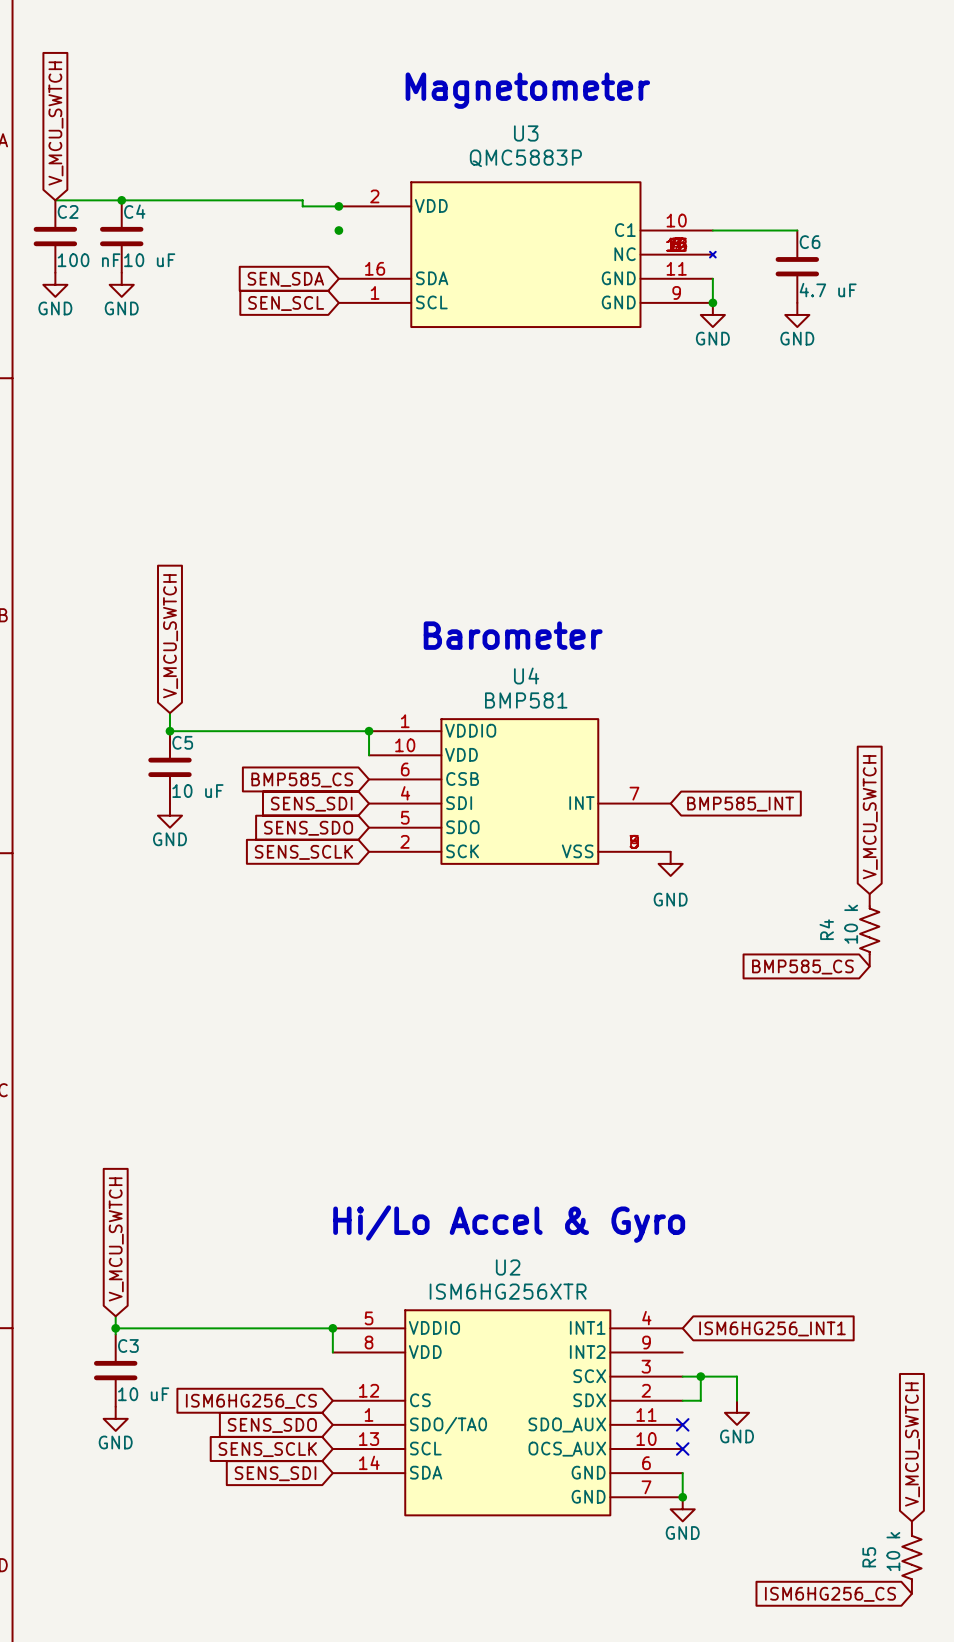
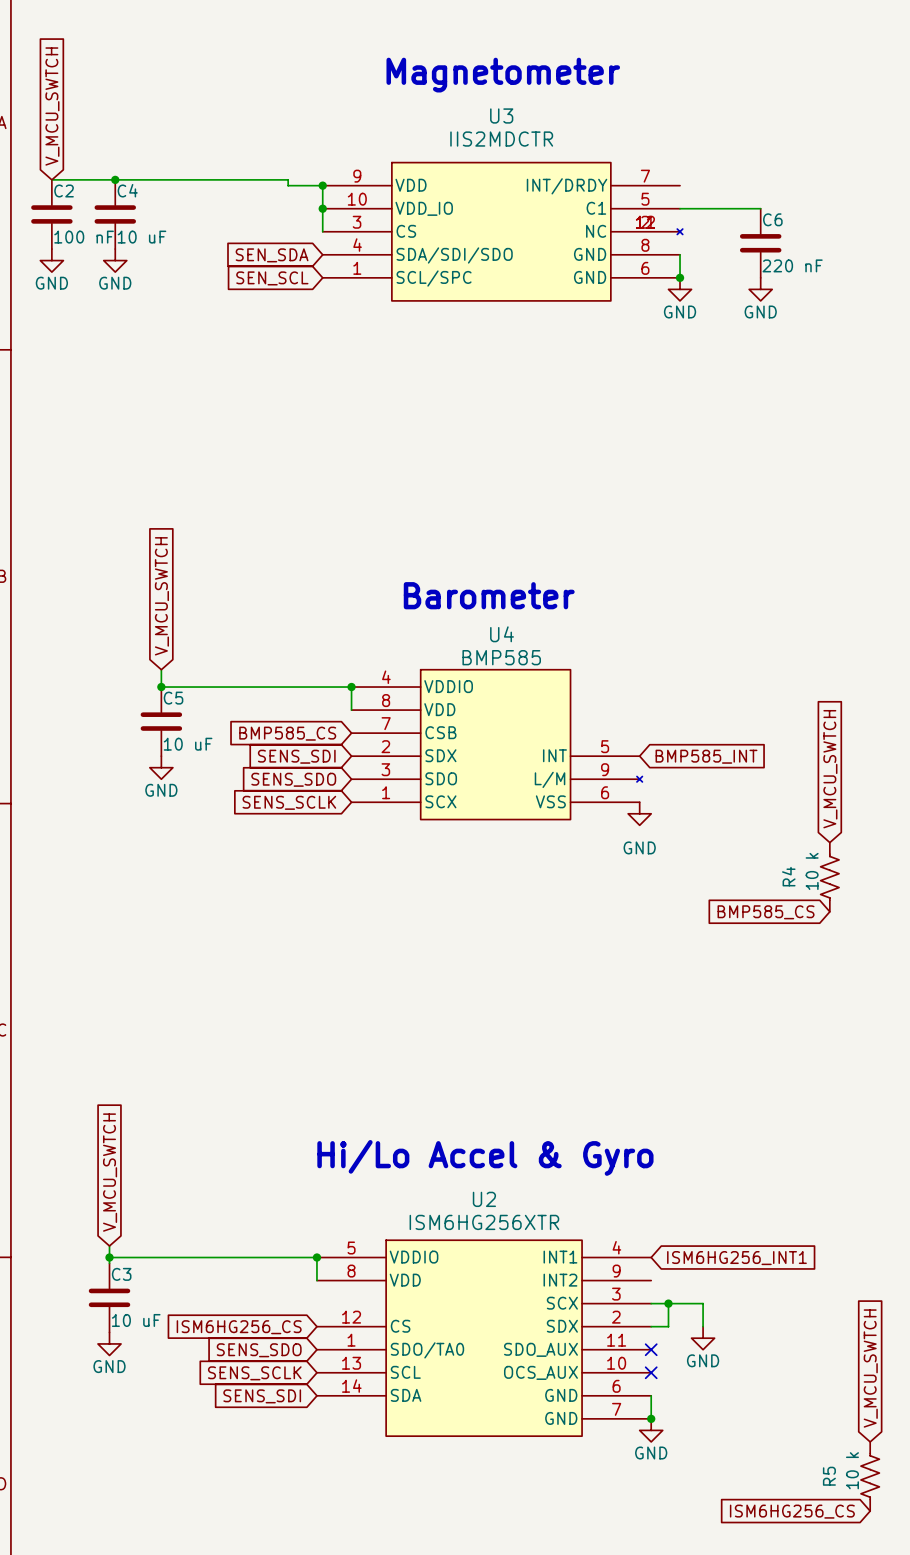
U3 value: QMC5883P (525, 158) -> IIS2MDCTR (501, 139)
U3 symbol: [338, 182, 716, 328] -> [322, 162, 683, 301]
wire: none -> (322, 185) (322, 231)
C6 value: 4.7 uF (828, 290) -> 220 nF (792, 265)
U4 value: BMP581 (526, 700) -> BMP585 (501, 657)
U4 symbol: [369, 719, 671, 864] -> [351, 669, 643, 820]

